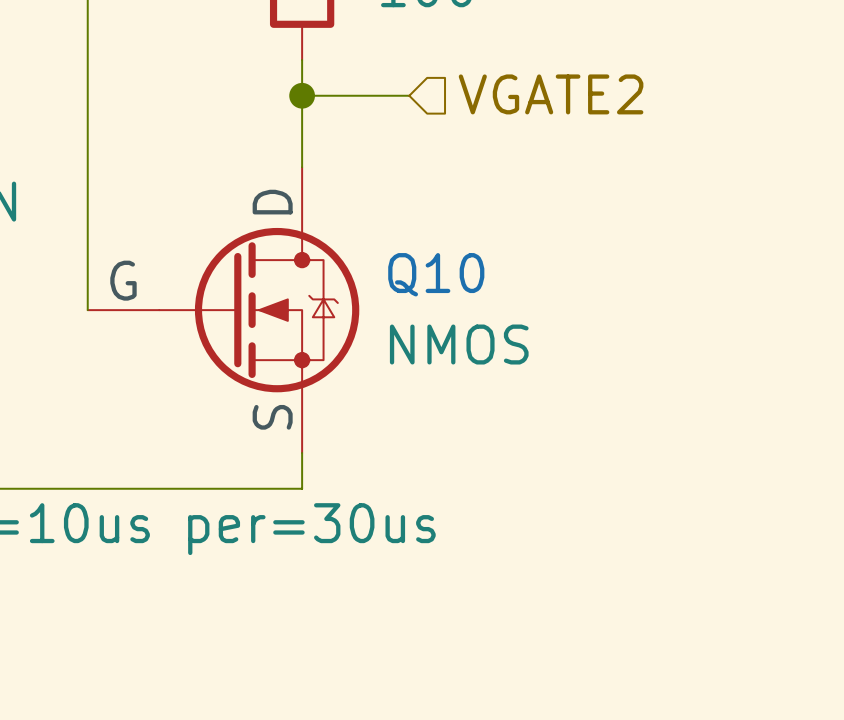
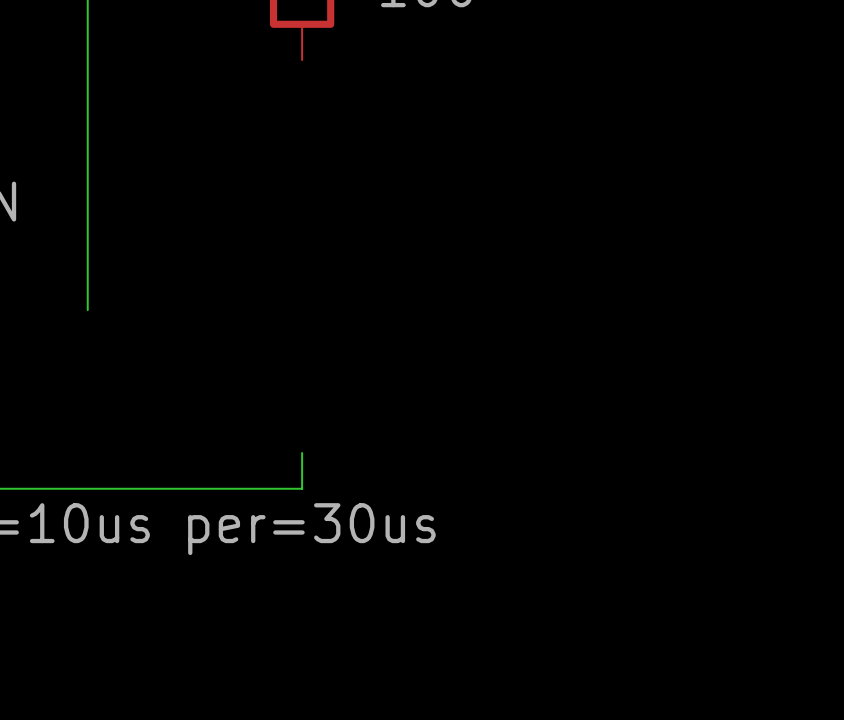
wire: (302, 60) (302, 167) -> none
hierarchical label: VGATE2 (551, 94) -> none
wire: (302, 95) (409, 95) -> none
junction: (302, 95) -> none
Q10: NMOS (223, 310) -> none

